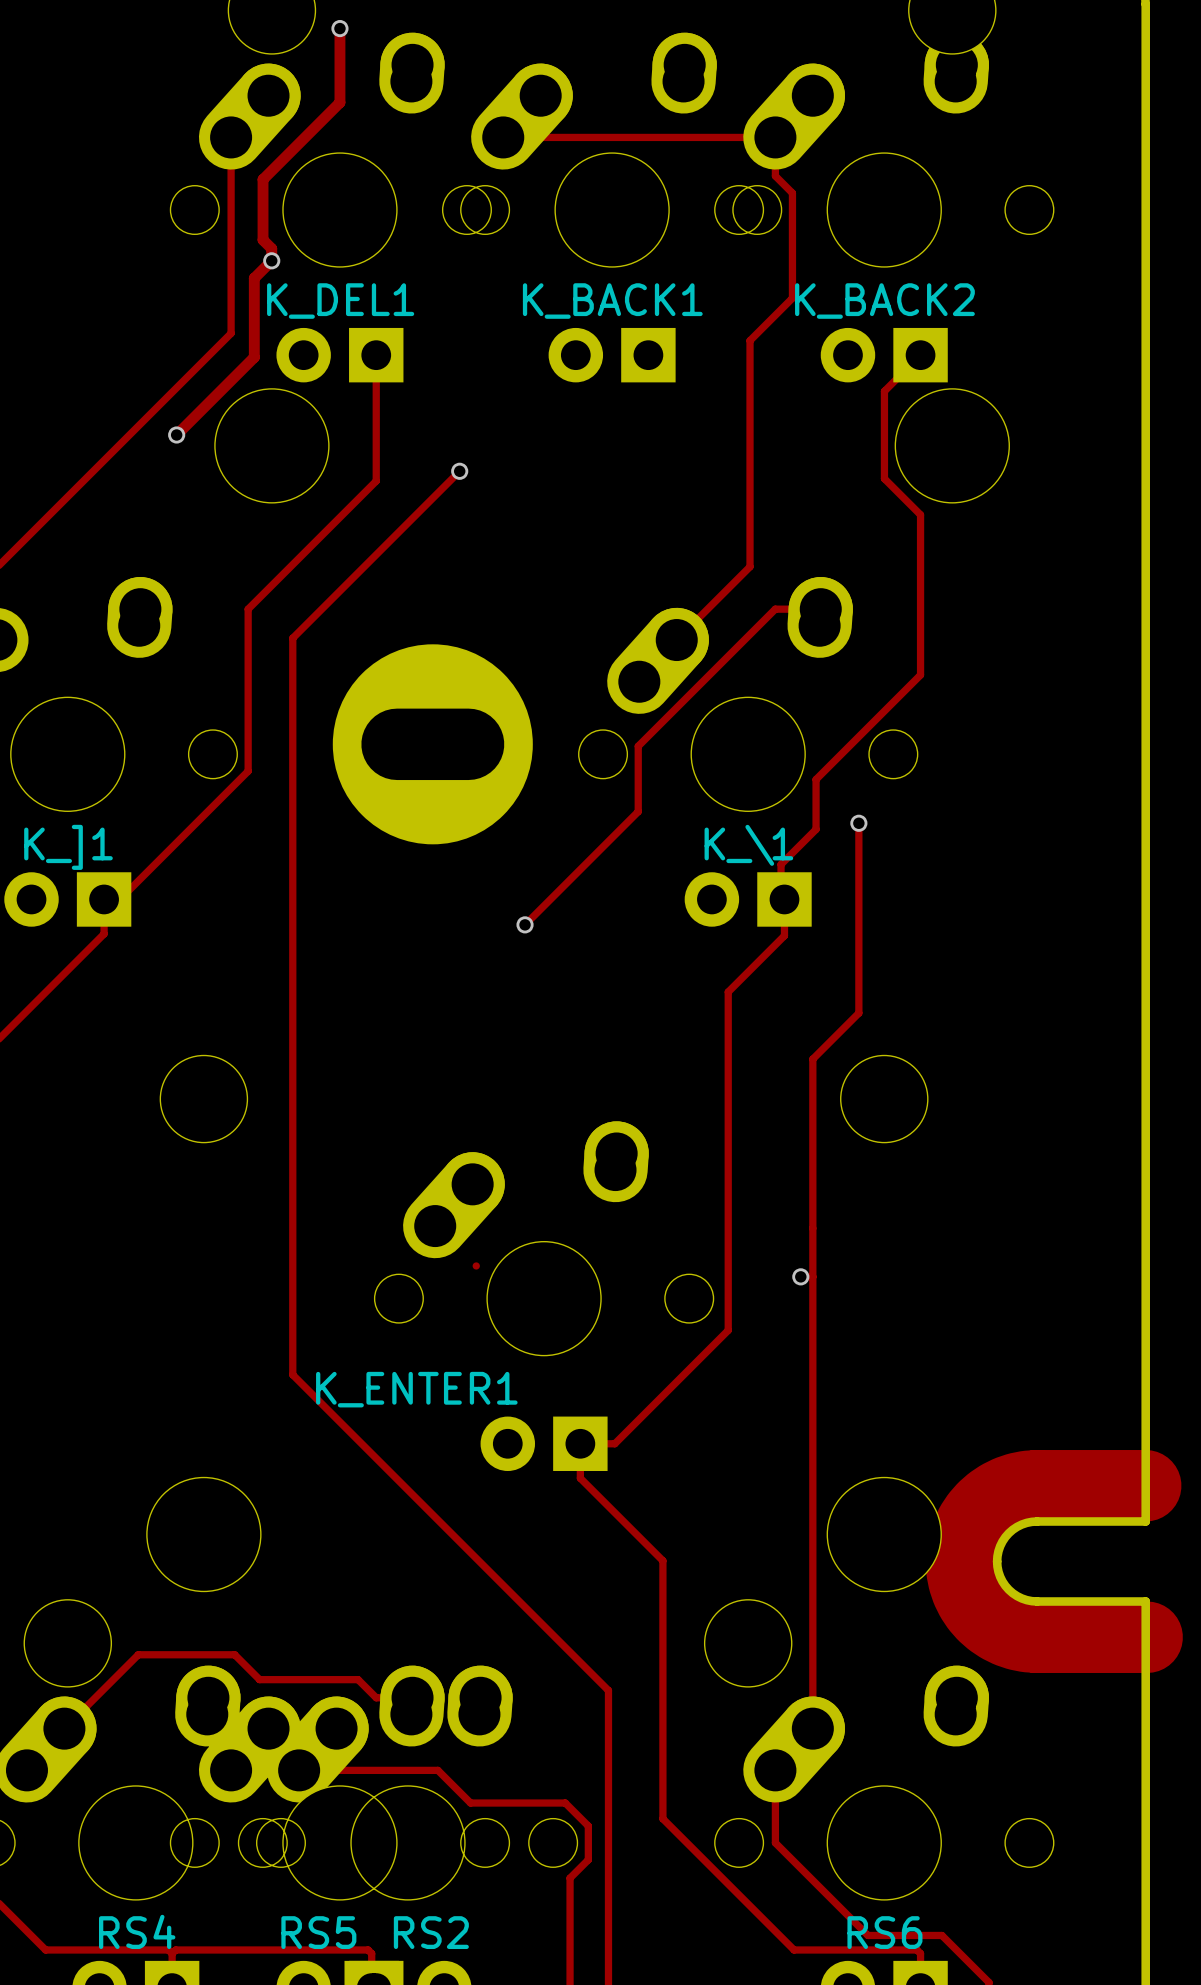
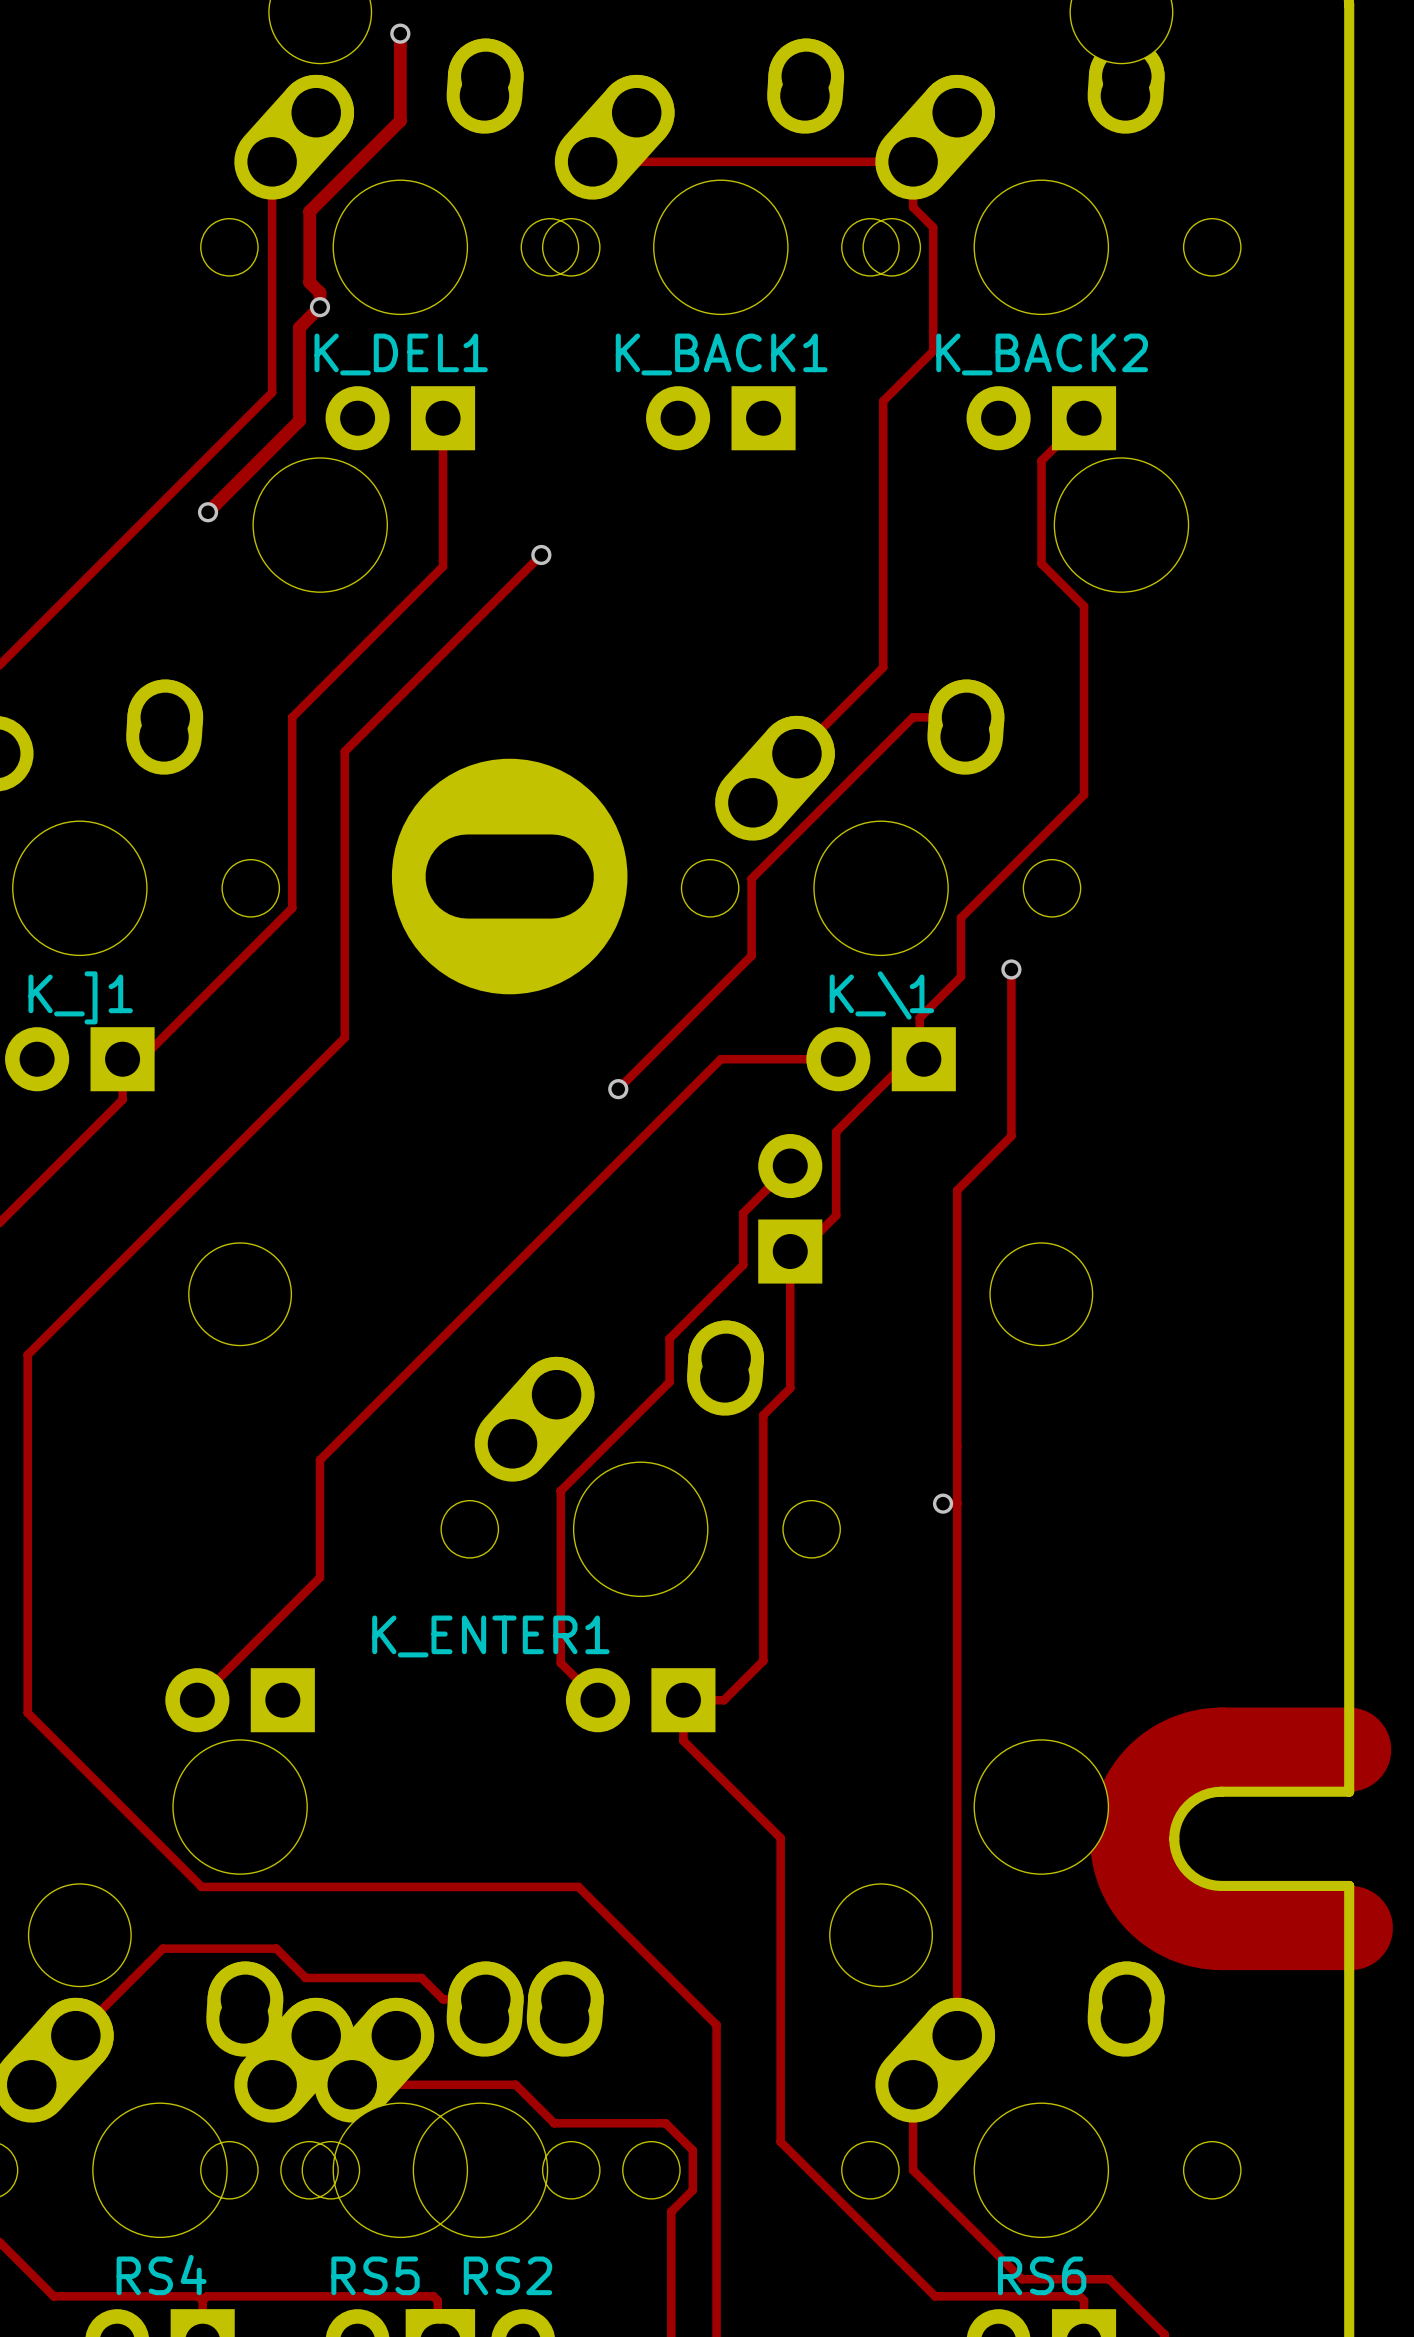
track: (292, 881) (292, 1374) (608, 1690) (608, 1719) -> (344, 1037) (27, 1354) (27, 1712) (201, 1886) (578, 1886) (716, 2024)
track: none -> (838, 1059) (720, 1059) (320, 1460) (320, 1577) (197, 1700)
track: (784, 899) (784, 935) (728, 992) (728, 1330) (648, 1410) -> (923, 1059) (908, 1059) (836, 1131) (836, 1215) (800, 1251) (790, 1251) (790, 1388) (763, 1415) (763, 1660)
track: (858, 964) (858, 1013) (812, 1059) -> (1011, 1136) (957, 1190) (957, 1247)
track: none -> (790, 1166) (743, 1213) (743, 1264) (669, 1338) (669, 1382) (560, 1490) (560, 1663) (597, 1700)
part: none -> (790, 1208)
part: none -> (240, 1700)

